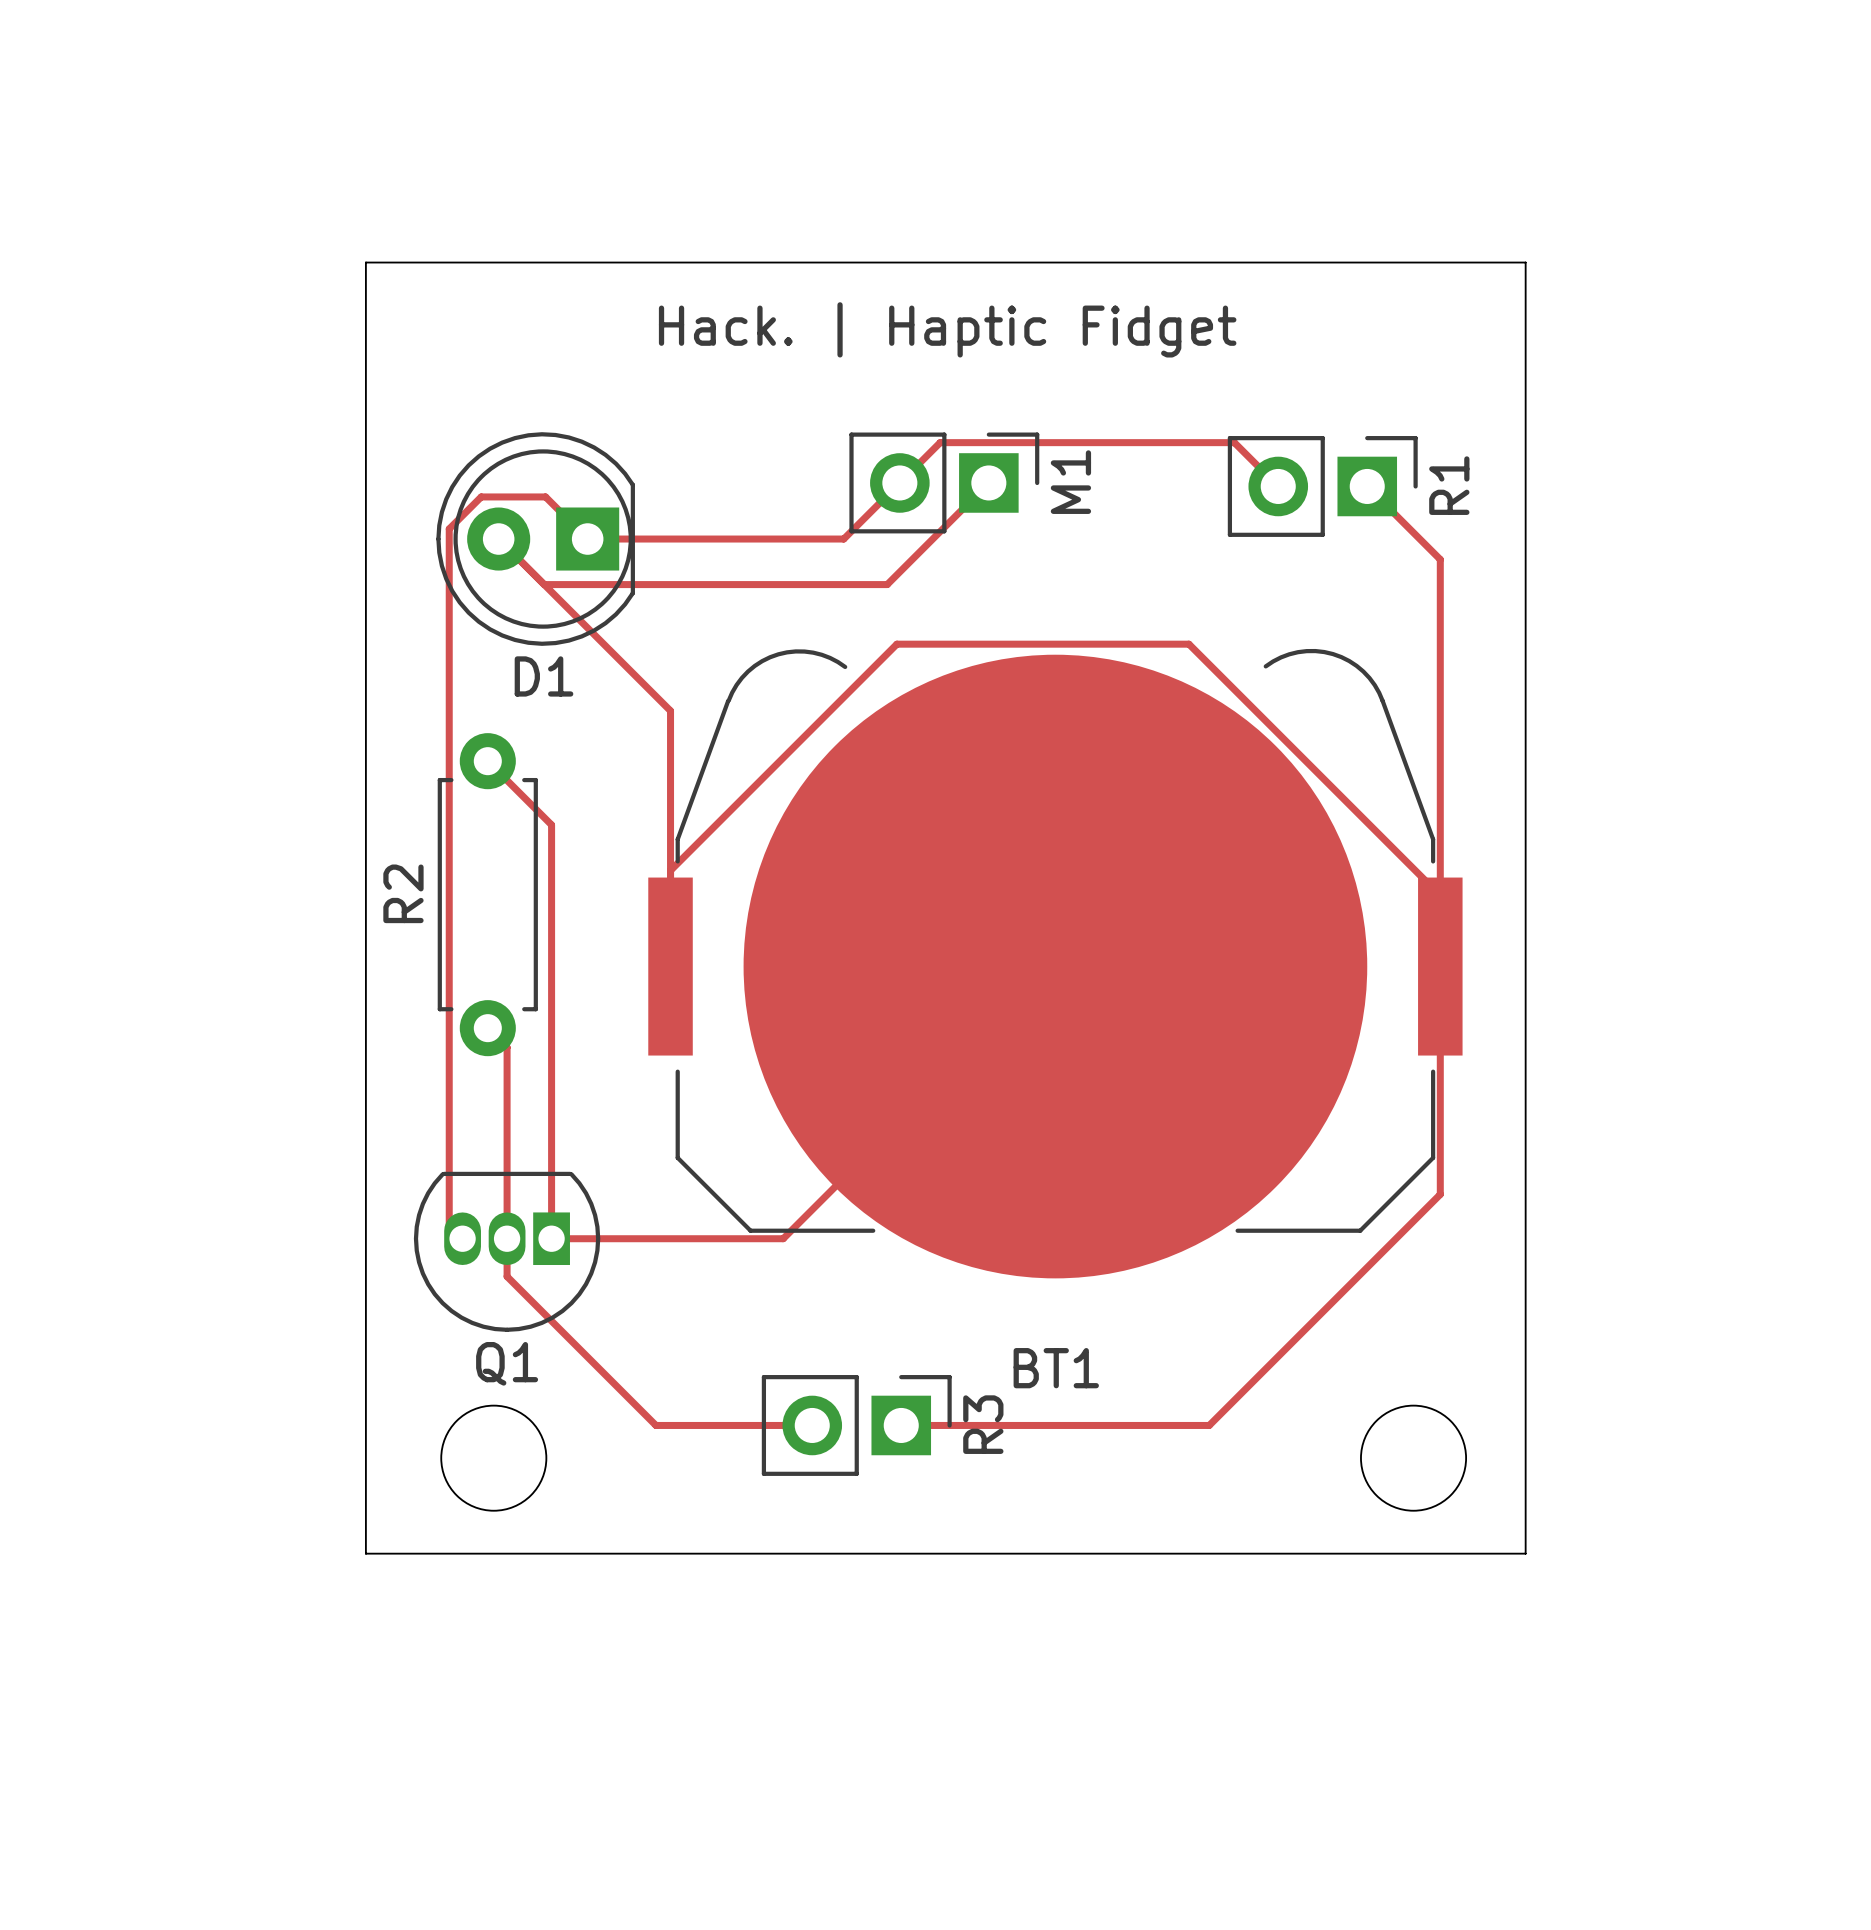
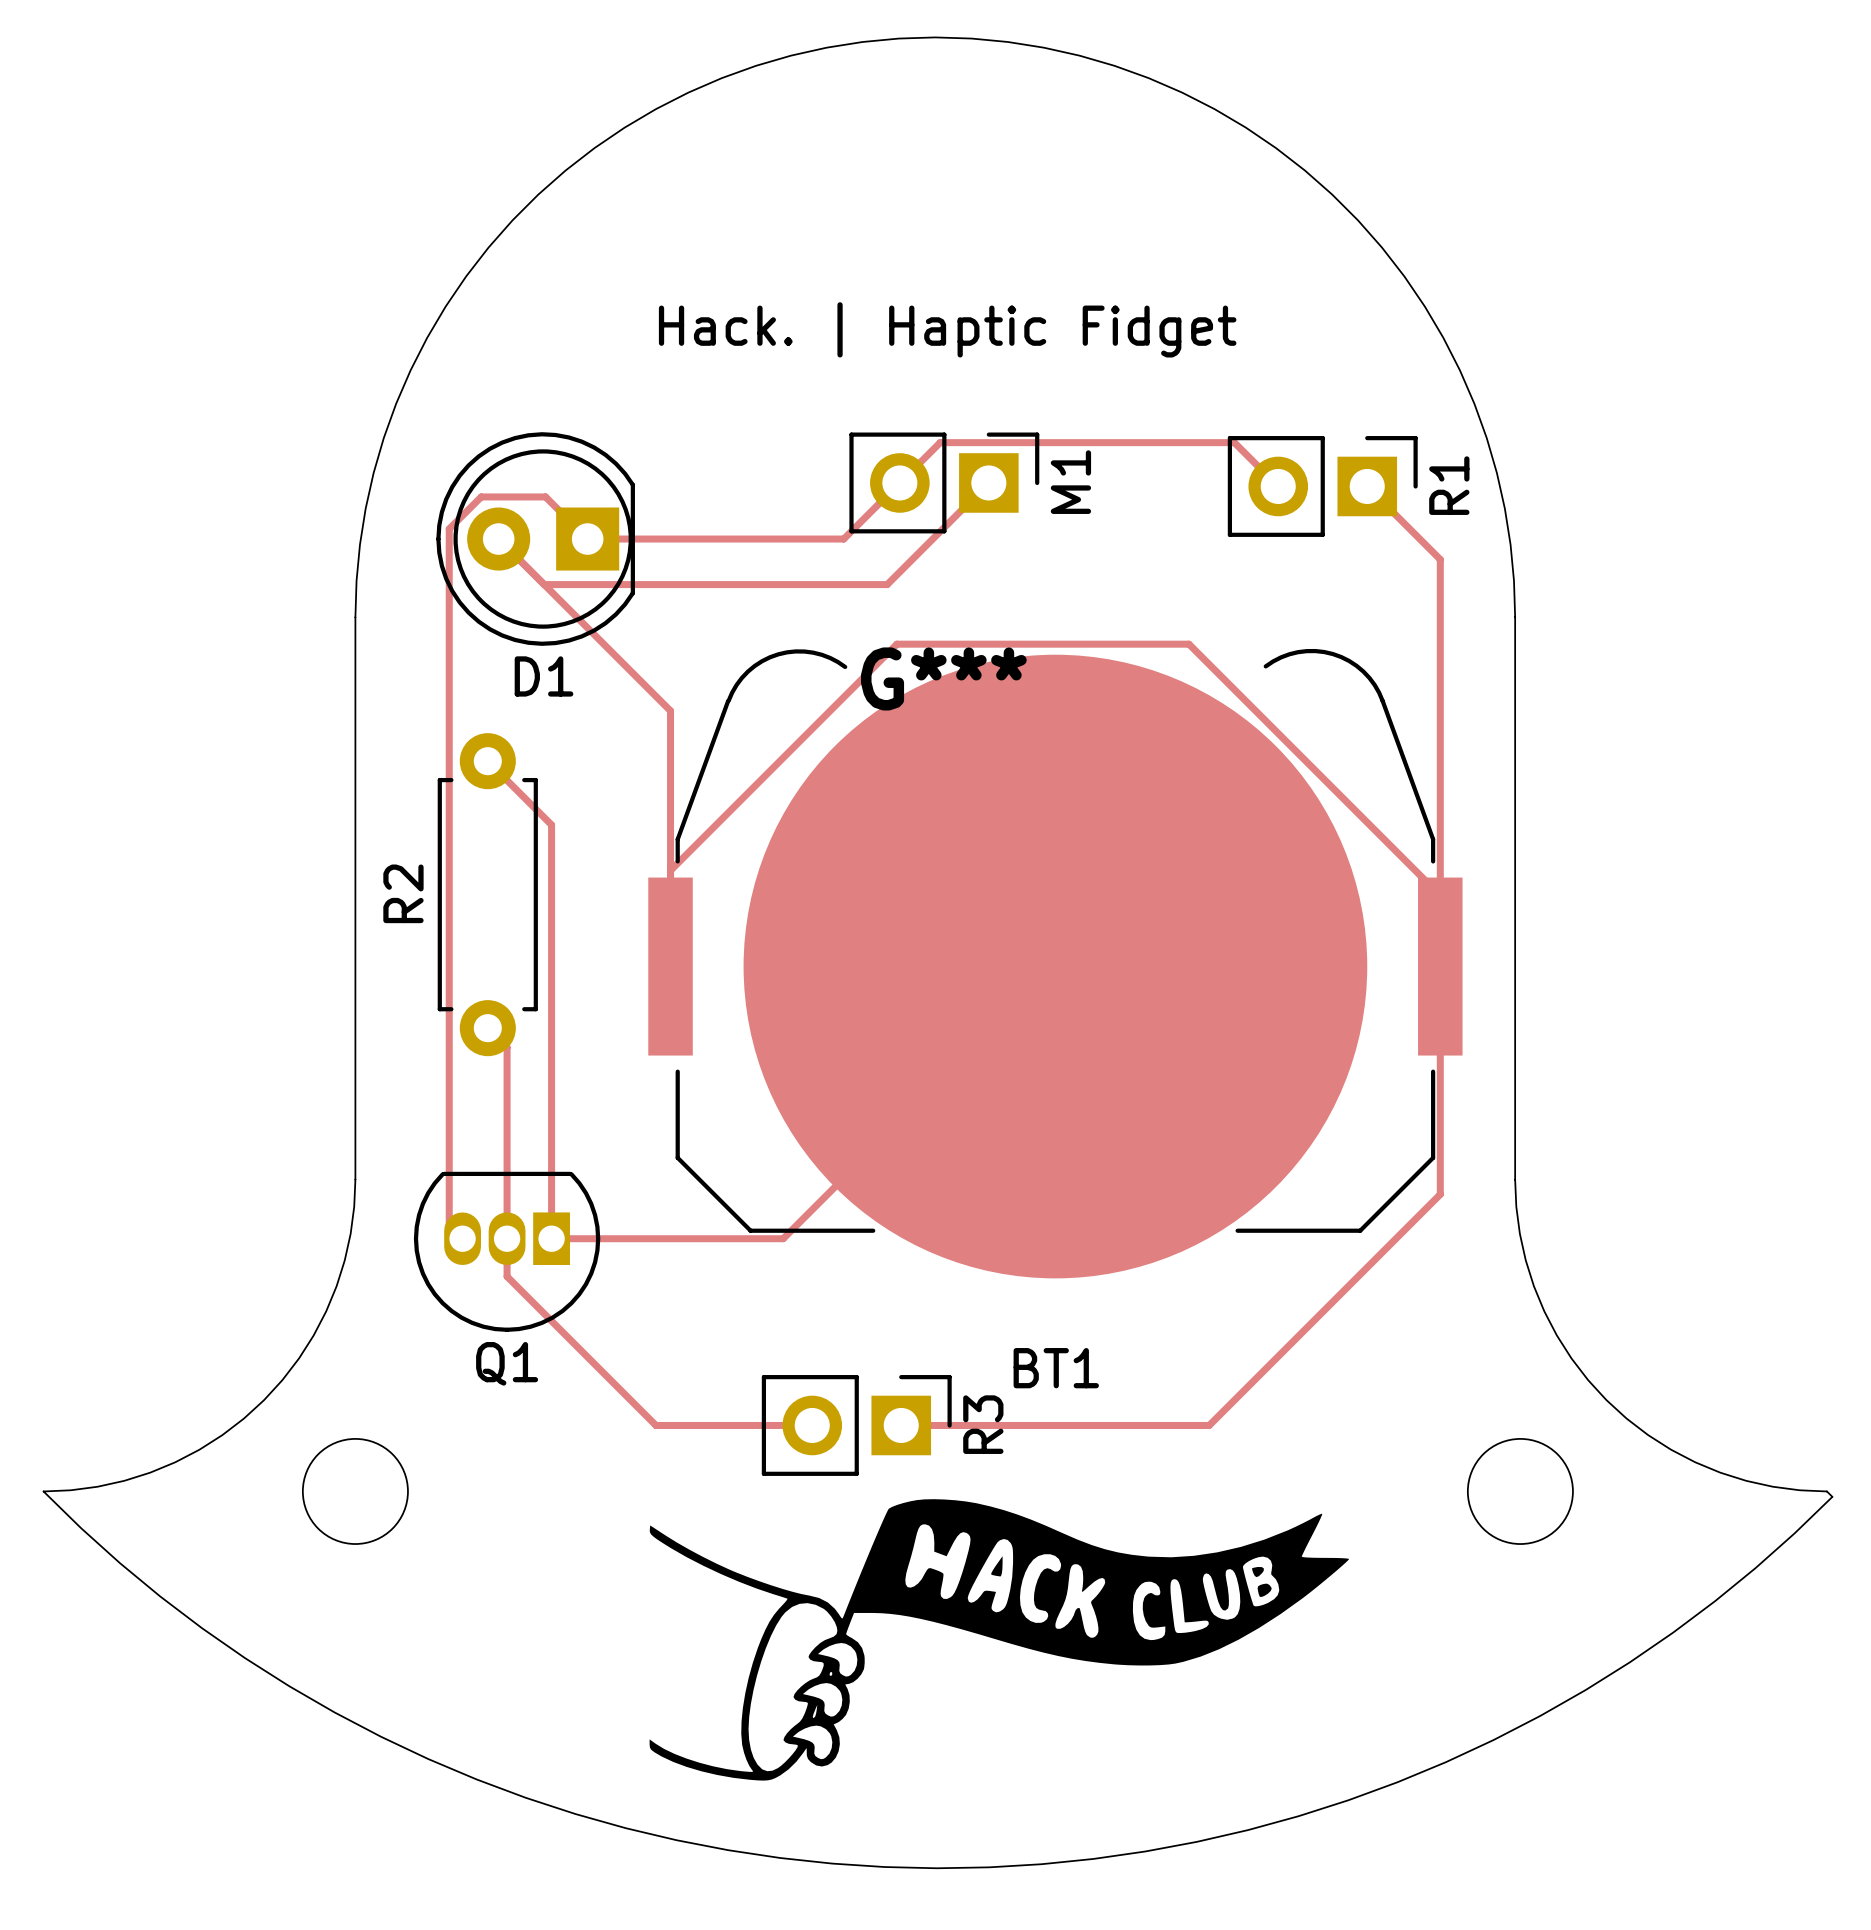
board edge: (365, 262) (1525, 262) (1525, 1553) (365, 1553) (365, 262) -> none
board edge: none -> (355, 617) (355, 1179) (350, 1233) (336, 1286) (313, 1335) (282, 1380) (264, 1400) (222, 1435) (199, 1449) (150, 1472) (97, 1486) (43, 1491) (119, 1563) (160, 1596) (245, 1658) (289, 1686) (381, 1736) (476, 1779) (575, 1814) (676, 1840) (780, 1857) (884, 1867) (989, 1867) (1093, 1858) (1196, 1841) (1298, 1816) (1397, 1782) (1493, 1740) (1585, 1690) (1673, 1632) (1755, 1568) (1832, 1496) (1826, 1491) (1772, 1486) (1720, 1472) (1695, 1462) (1648, 1435) (1606, 1400) (1588, 1380) (1556, 1335) (1544, 1311) (1525, 1260) (1516, 1206) (1515, 617) (1510, 544) (1496, 473) (1474, 403) (1459, 370) (1424, 306) (1404, 276) (1357, 220) (1332, 194) (1276, 148) (1245, 127) (1182, 92) (1148, 78) (1079, 55) (1007, 41) (935, 37) (862, 41) (791, 55) (721, 78) (655, 109) (594, 148) (565, 170) (512, 220) (466, 276) (427, 337) (396, 403) (373, 473) (359, 544) (355, 617)
G***: none -> (943, 678)
round board edge position: (493, 1458) -> (355, 1491)
round board edge position: (1413, 1458) -> (1520, 1491)
drawing: none -> [649, 1499, 1350, 1781]

